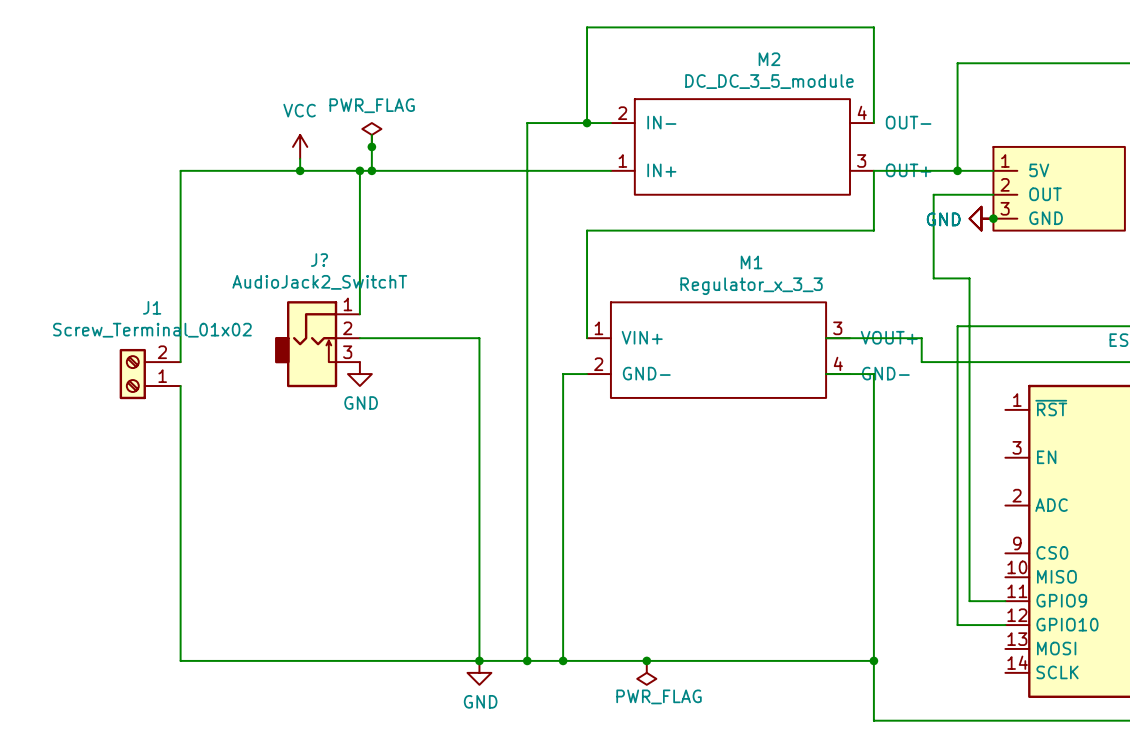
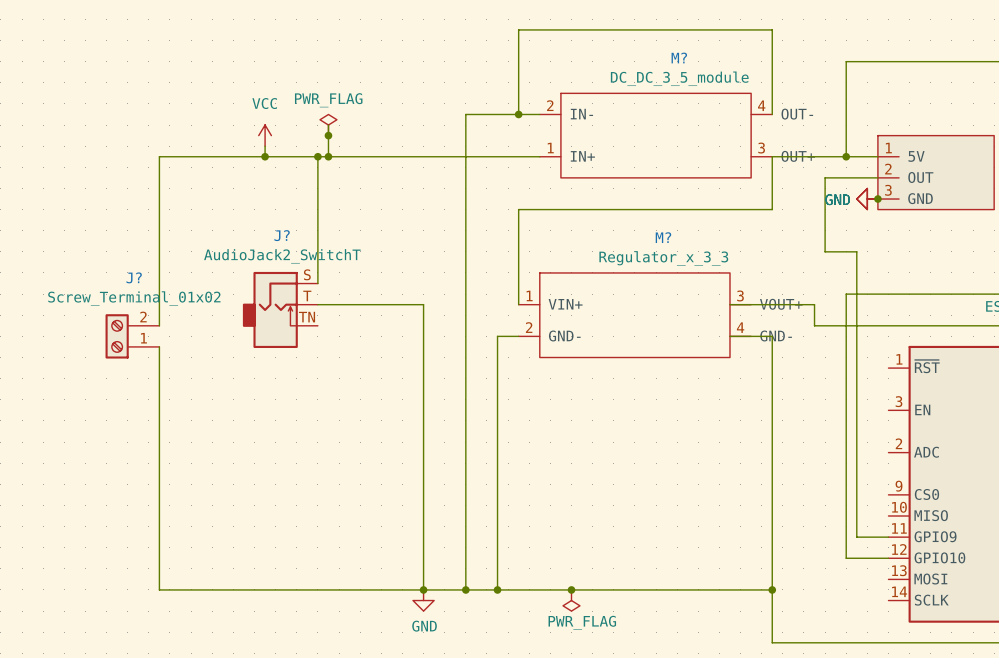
M2 name: M2 (769, 59) -> M? (679, 57)
M1 name: M1 (751, 262) -> M? (663, 237)
J? pin number: 1 (347, 304) -> S (307, 274)
J1 name: J1 (152, 307) -> J? (134, 277)
J? pin number: 2 (347, 328) -> T (307, 295)
J? pin number: 3 (347, 352) -> TN (307, 317)
power symbol: GND (359, 374) -> none

